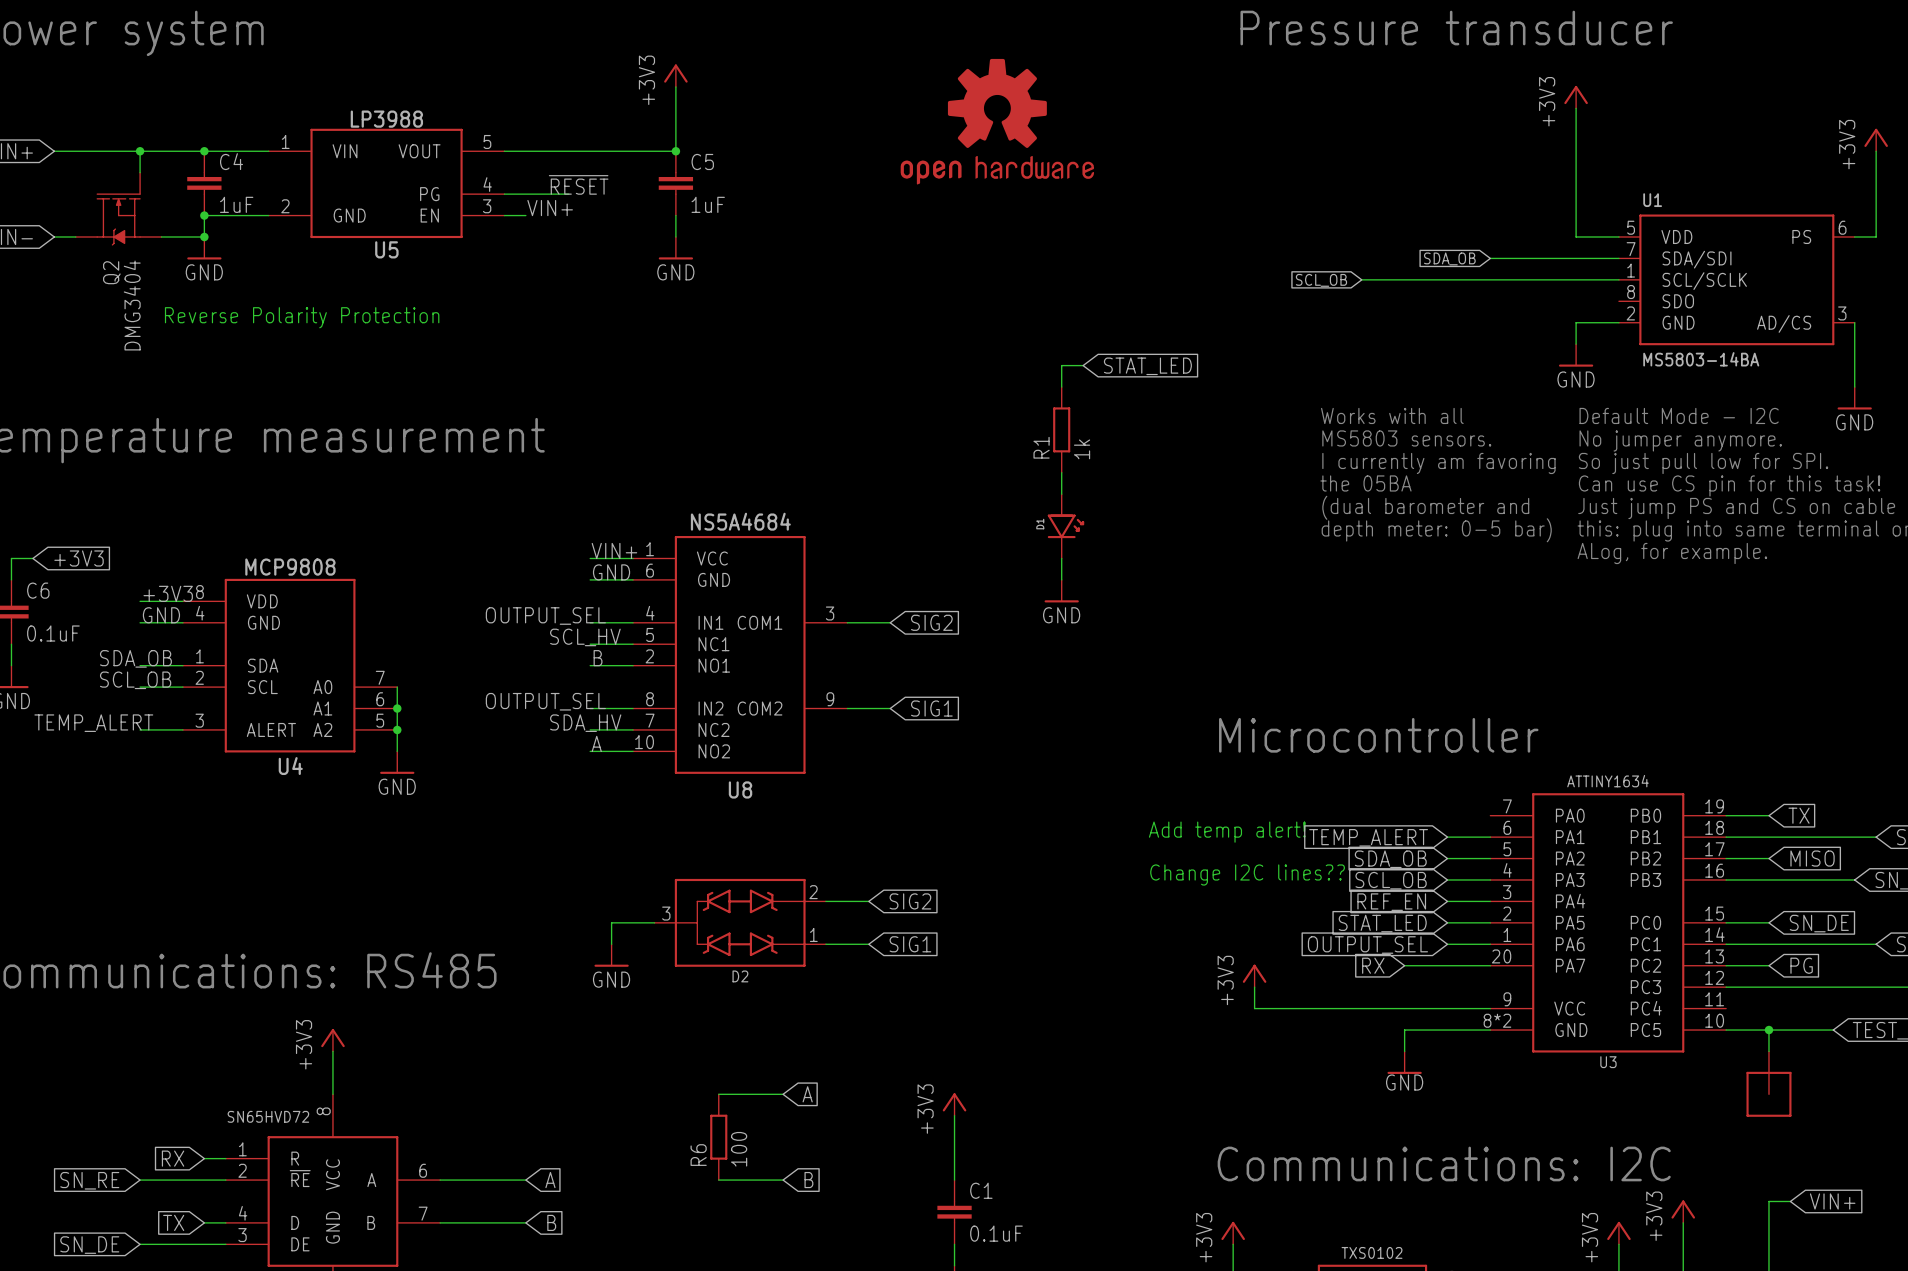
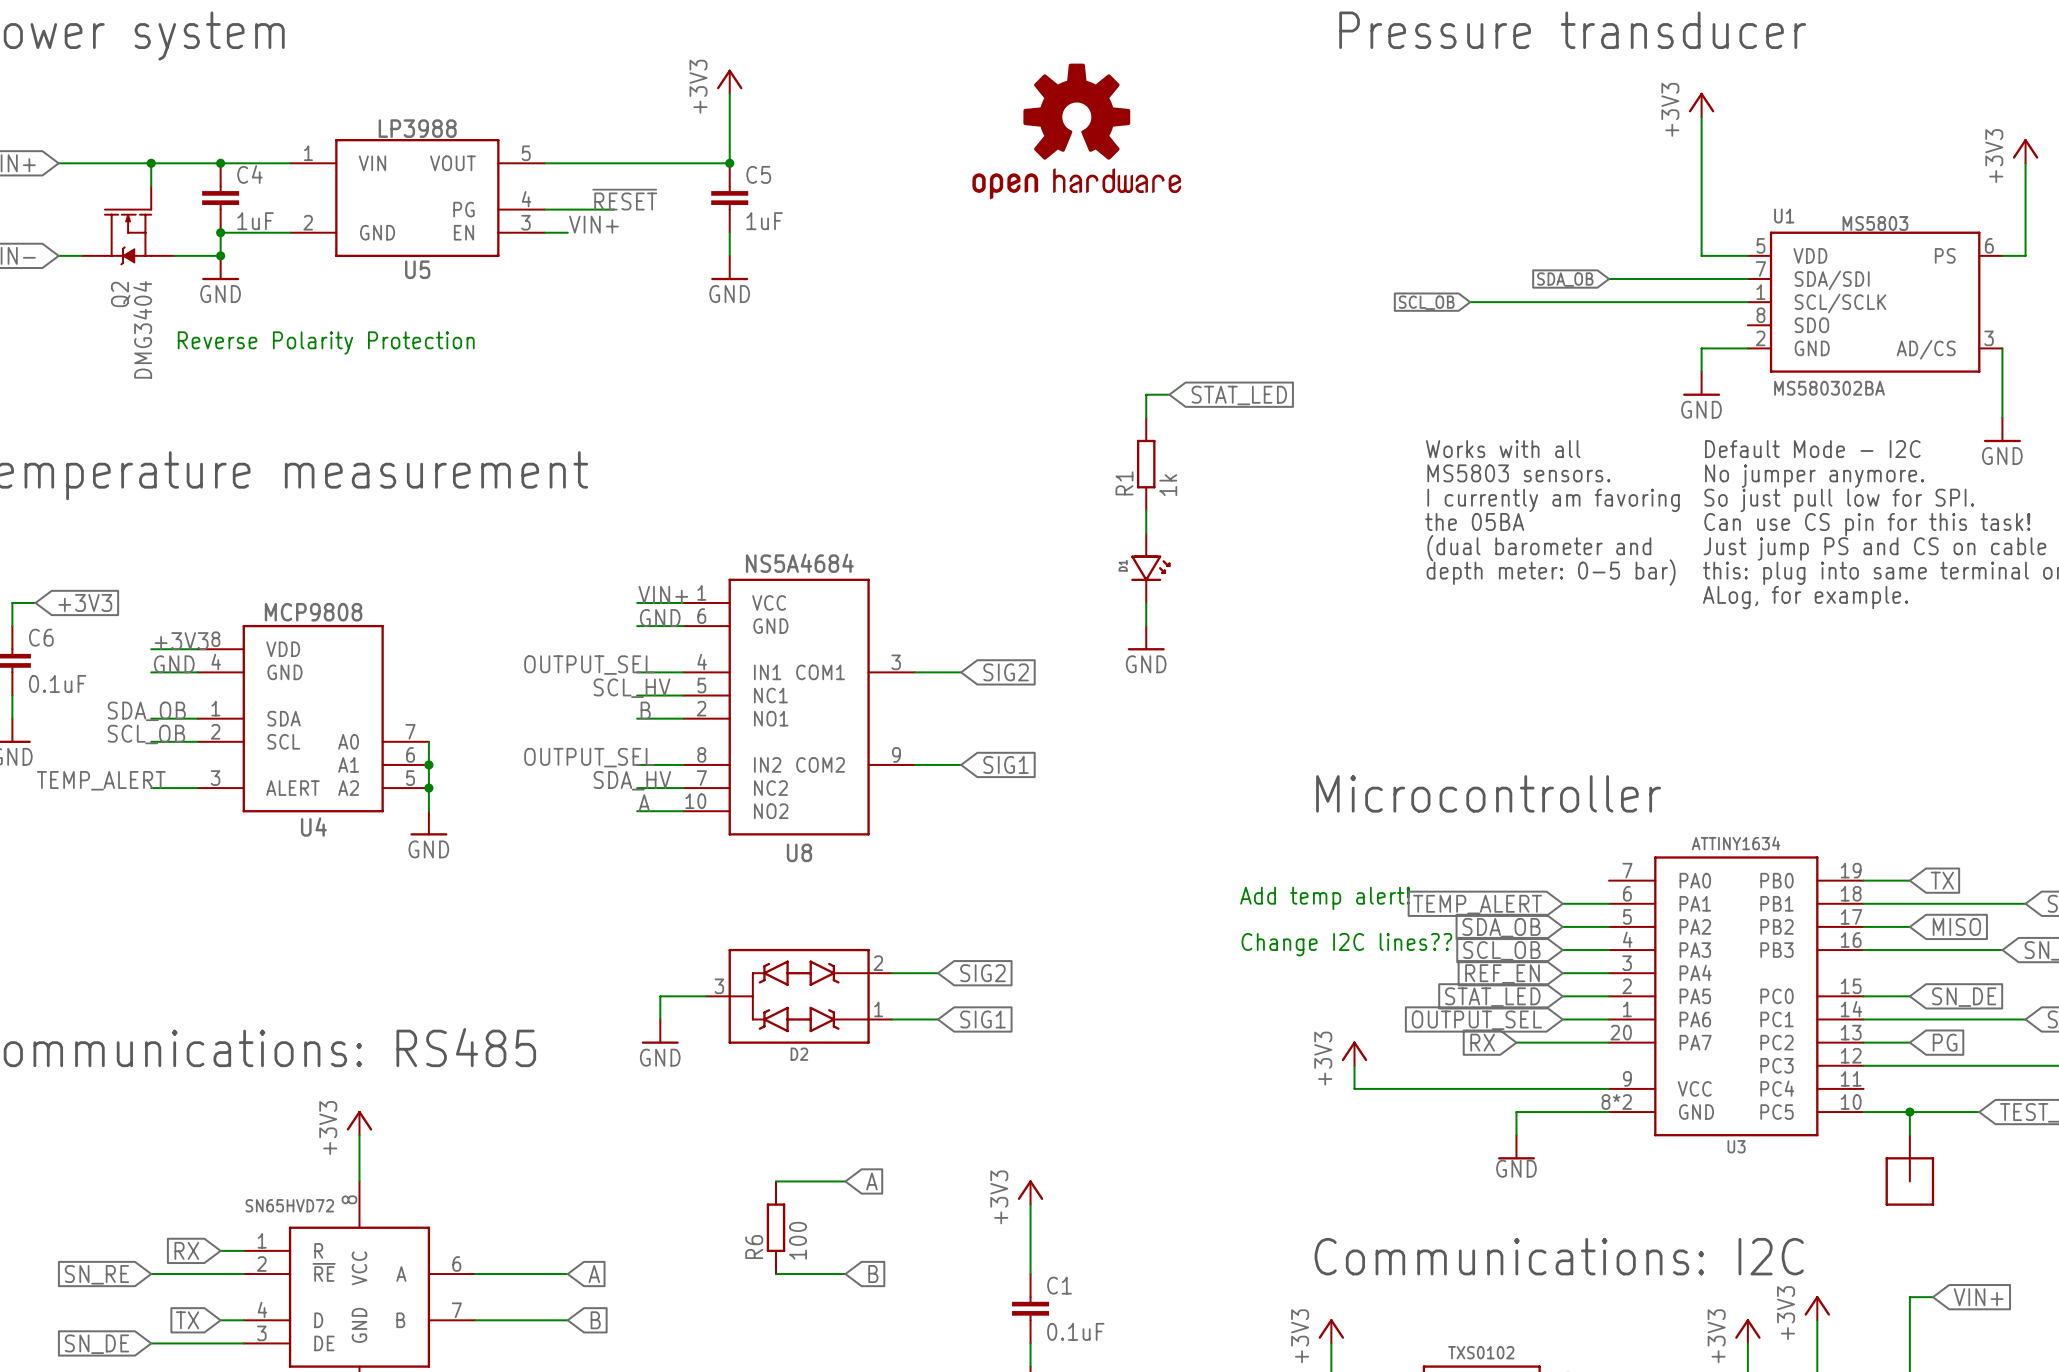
U1 text: none -> MS5803 (1875, 223)
U1 value: MS5803-14BA (1701, 359) -> MS580302BA (1829, 388)

